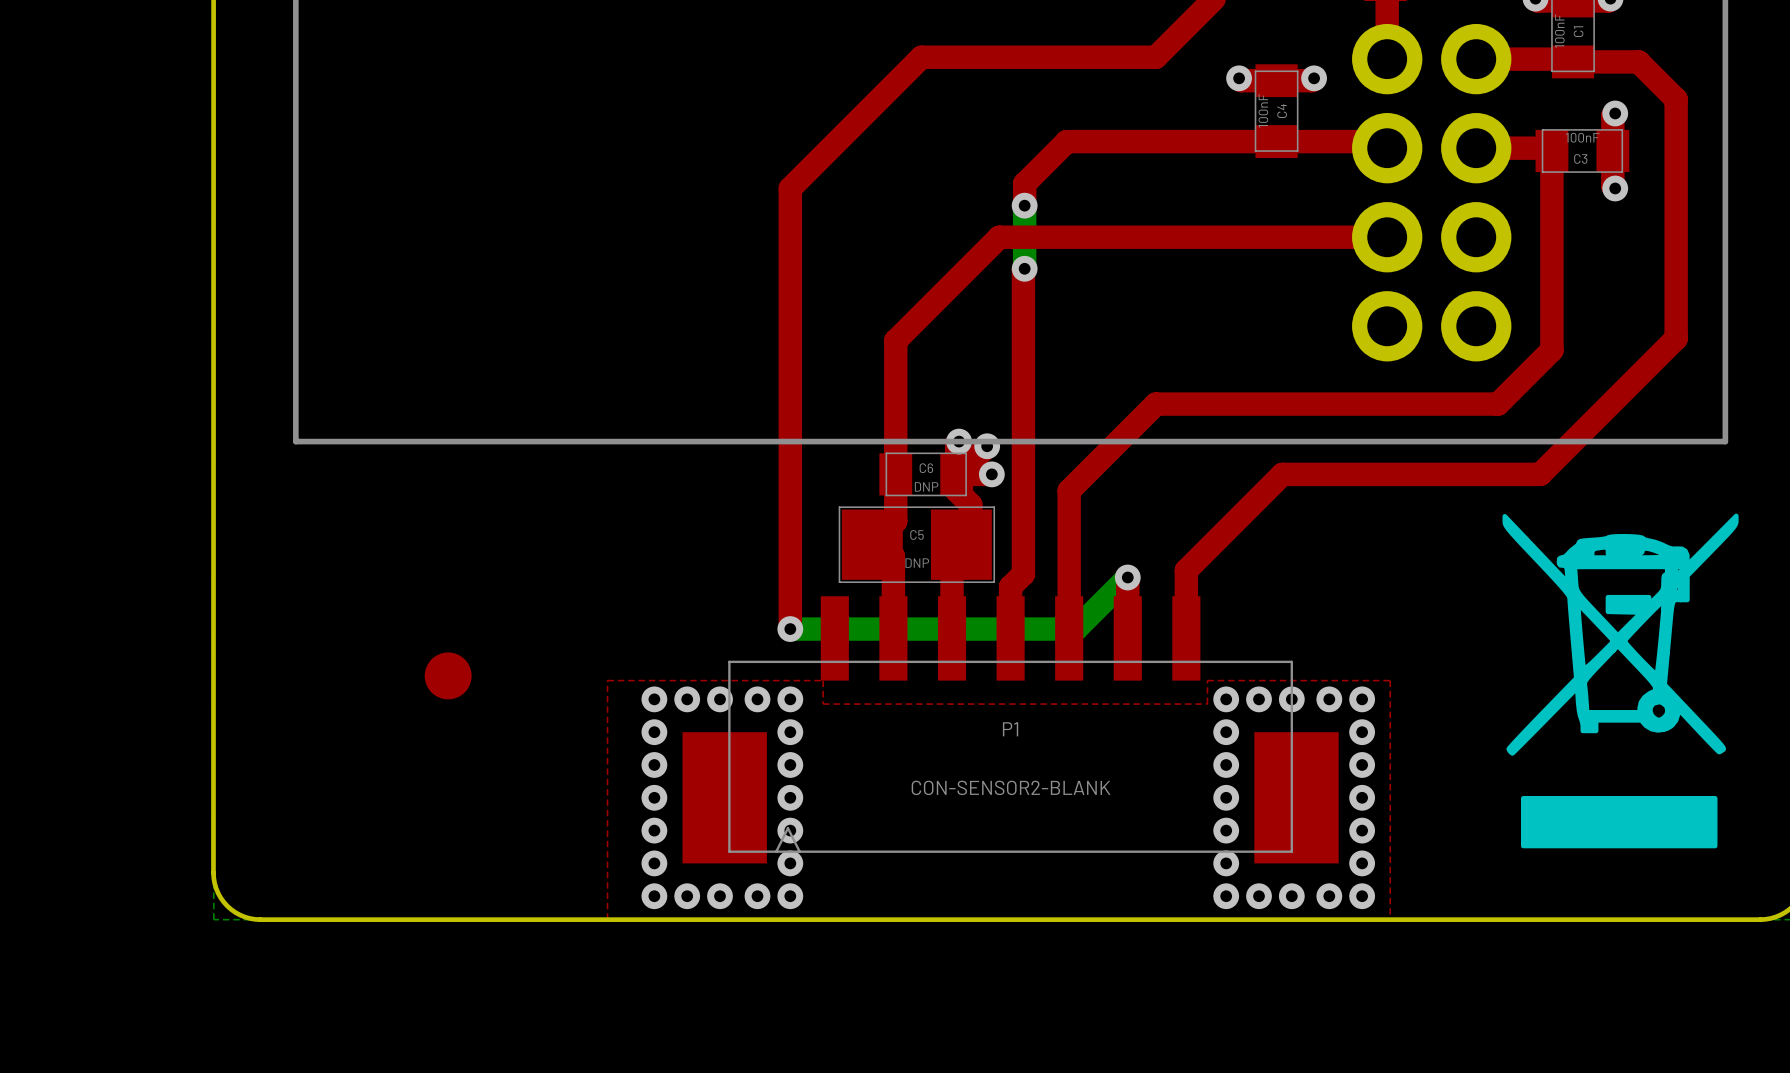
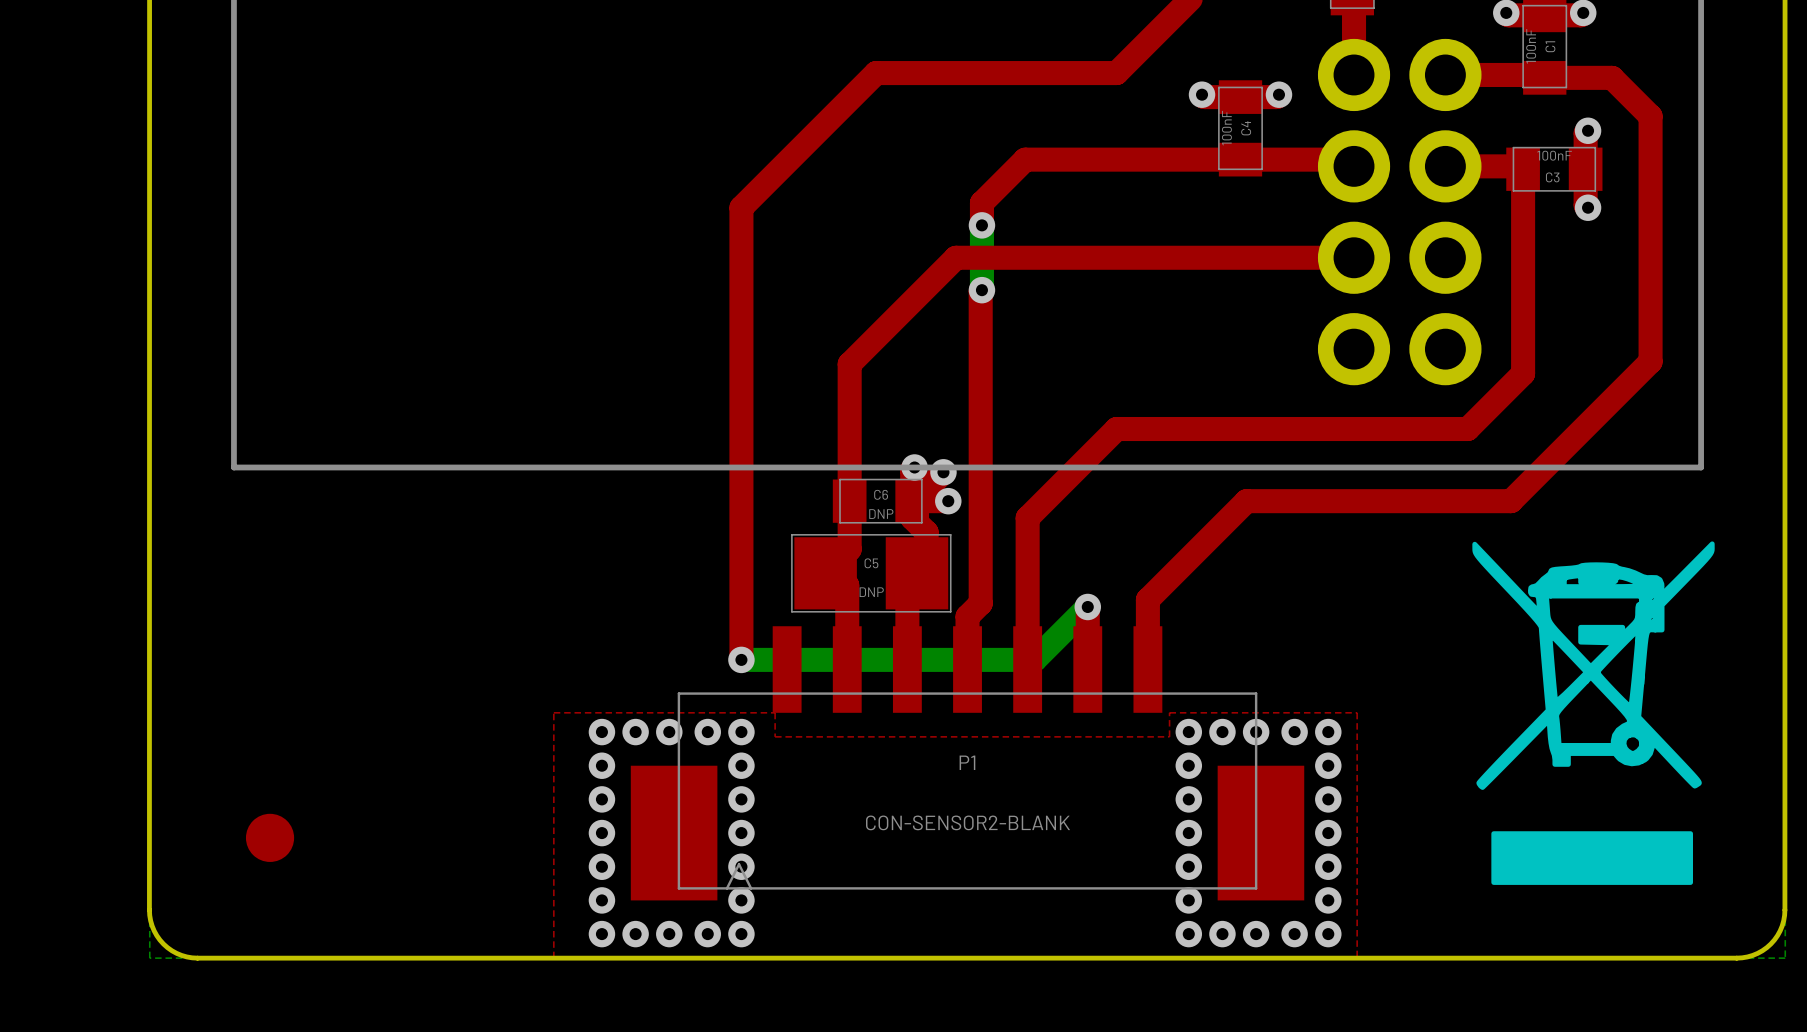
part position: (448, 675) -> (270, 837)

